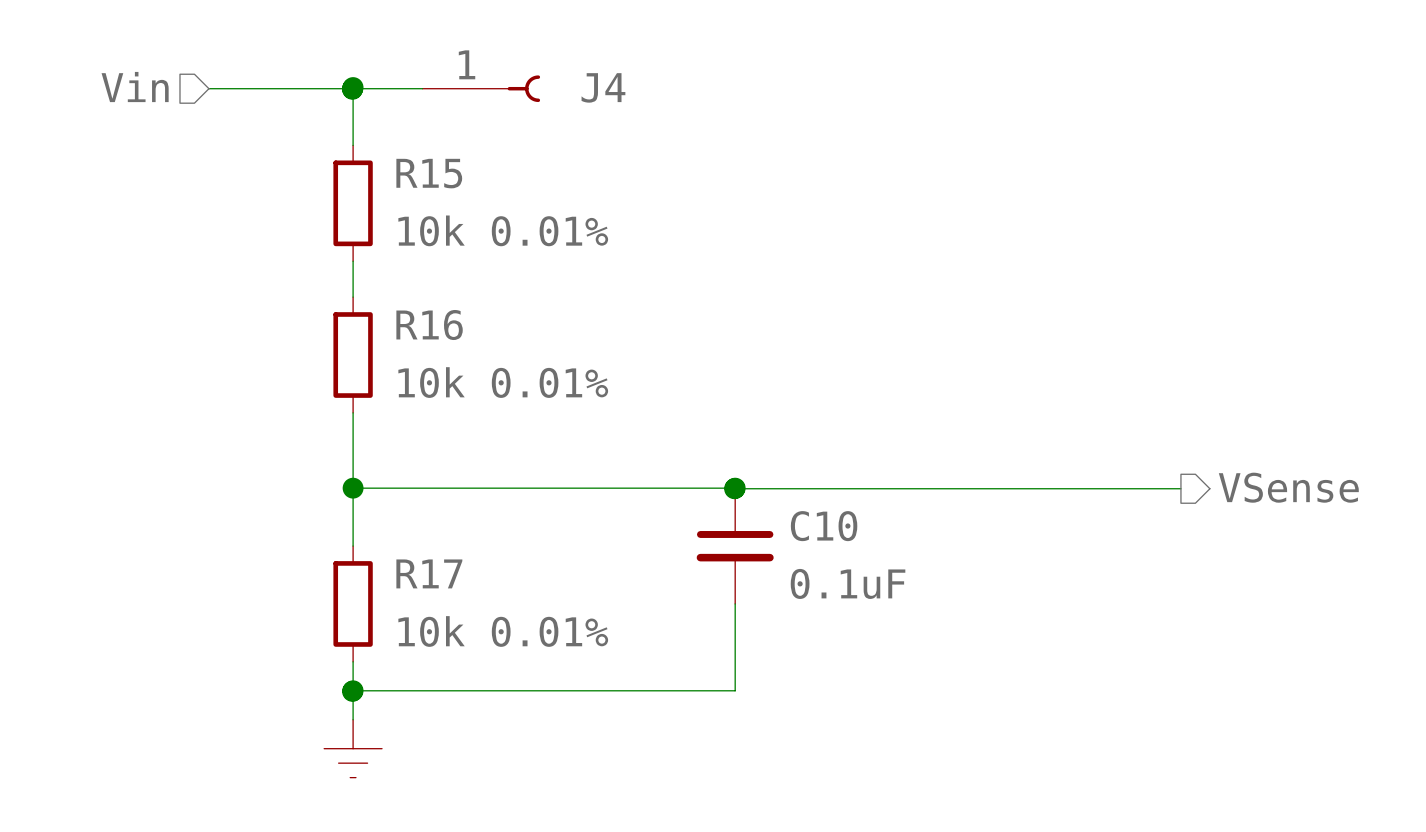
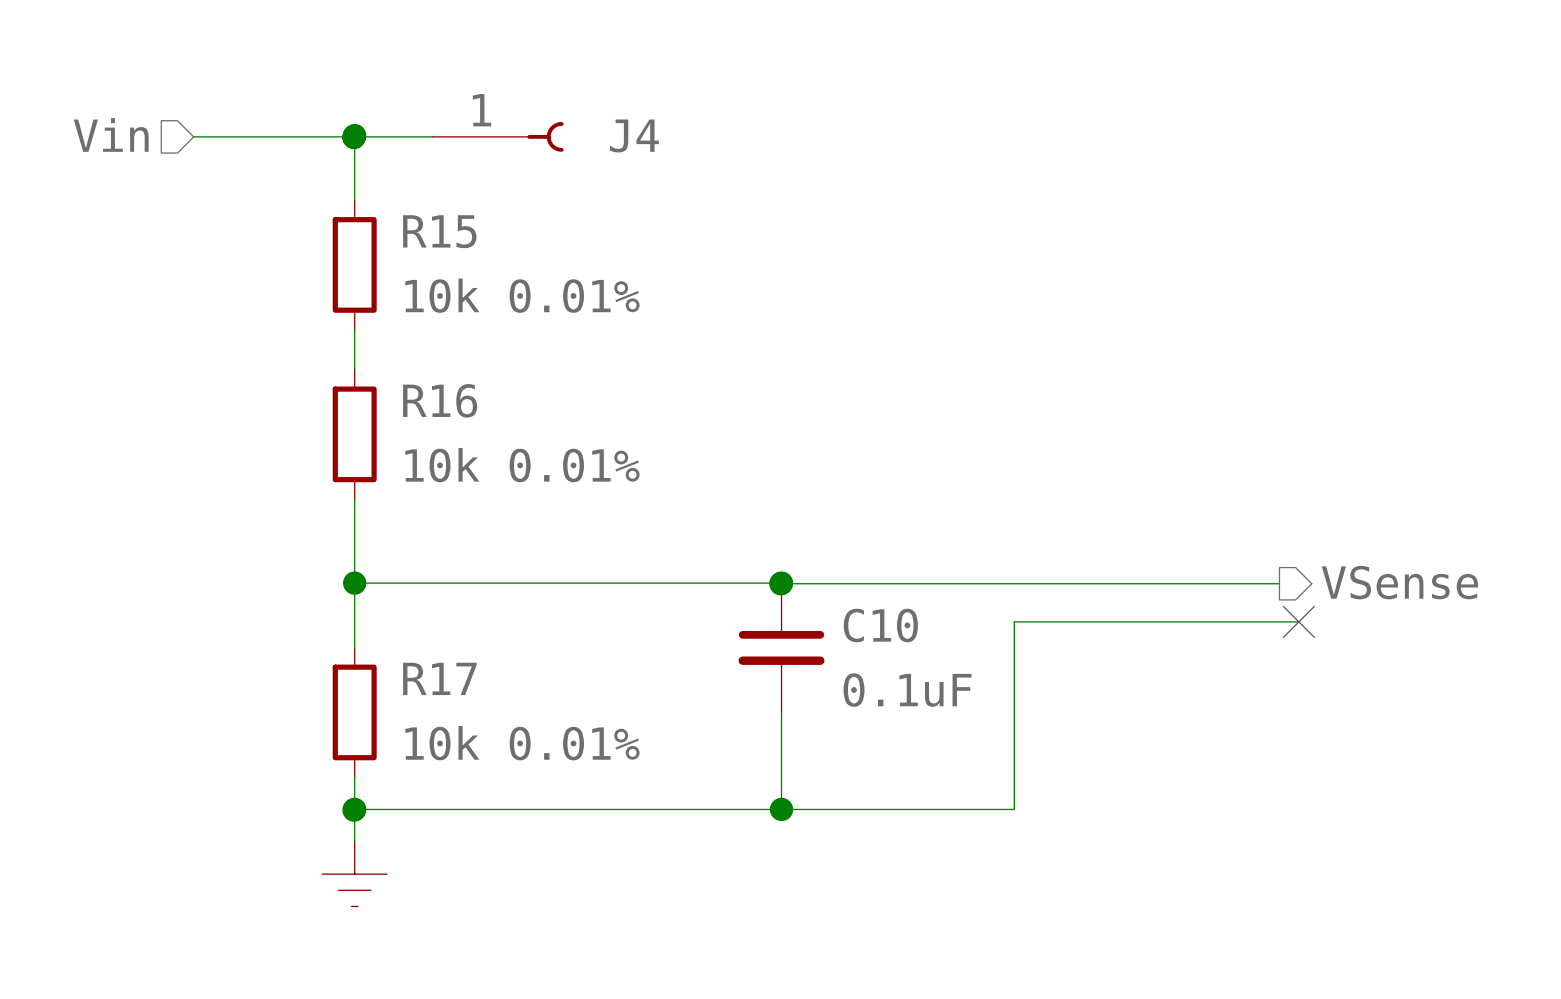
wire: none -> (1298, 621) (1014, 621) (1014, 809) (781, 809)
no-connect mark: none -> (1298, 621)
junction: none -> (781, 809)

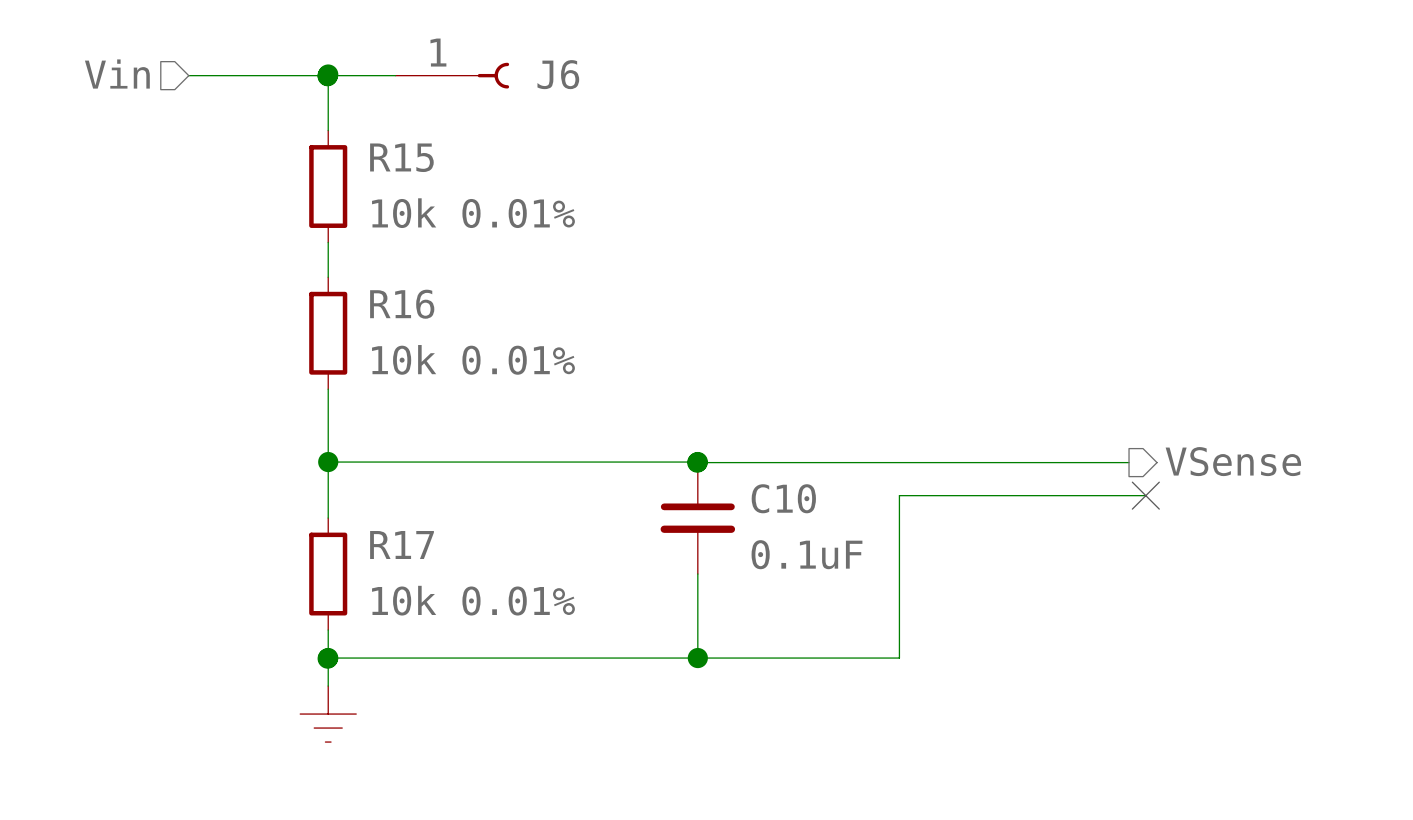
J4 name: J4 (634, 135) -> J6 (558, 74)

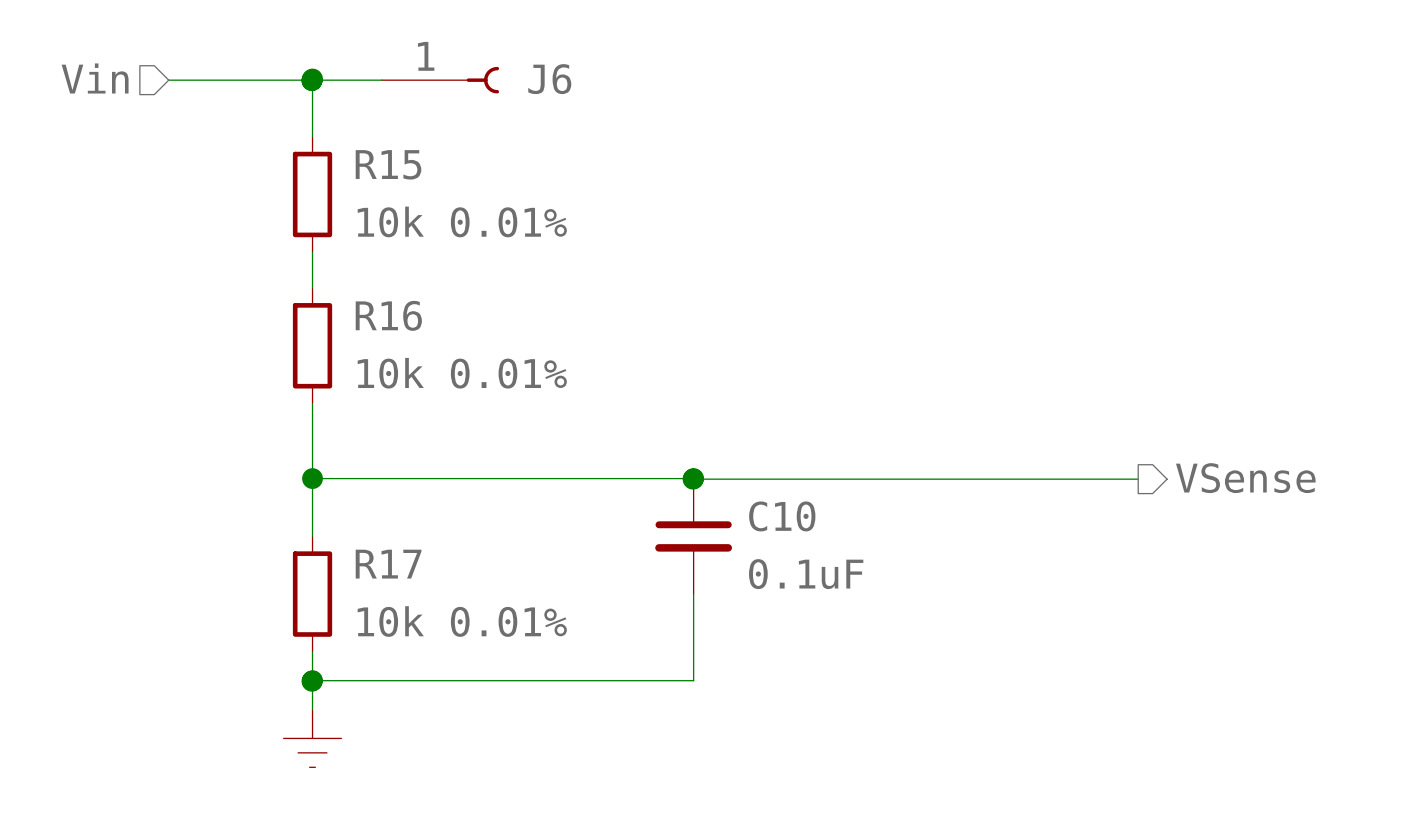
wire: (1145, 495) (899, 495) (899, 658) (697, 658) -> none
no-connect mark: (1145, 495) -> none
junction: (697, 658) -> none

